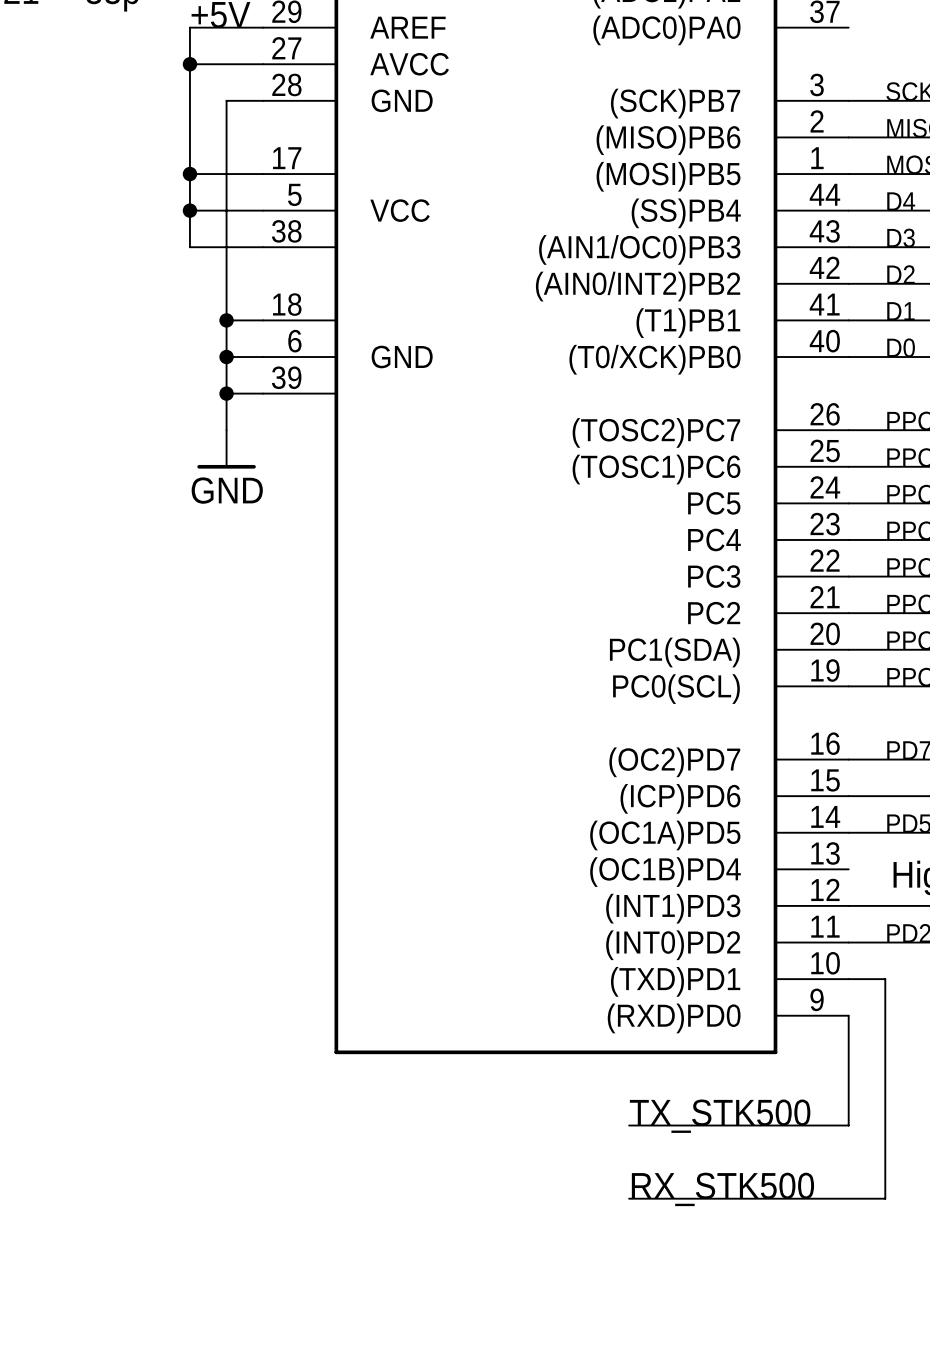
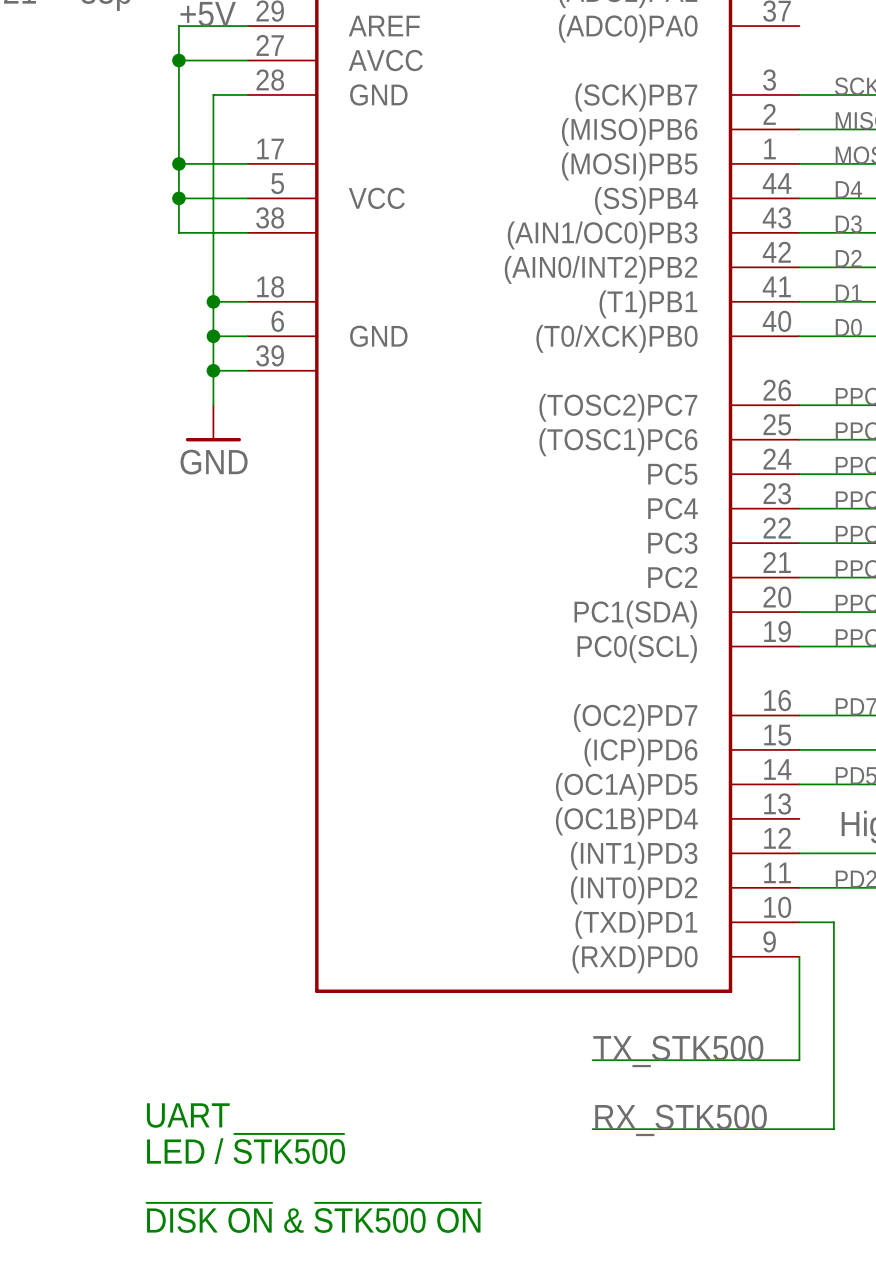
text: none -> UART (188, 1115)
text: none -> LED / ~{STK500} (246, 1148)
text: none -> ~{DISK ON} & ~{STK500 ON} (313, 1217)

